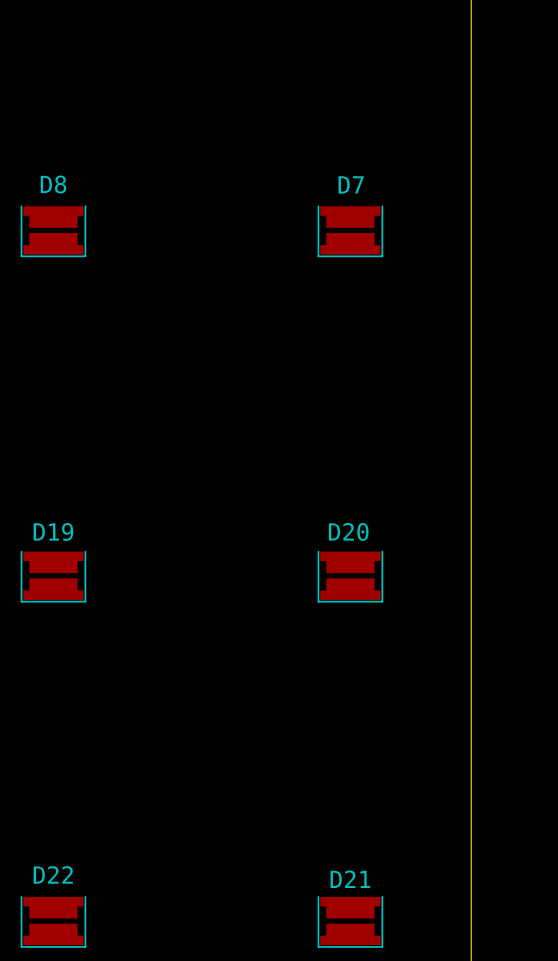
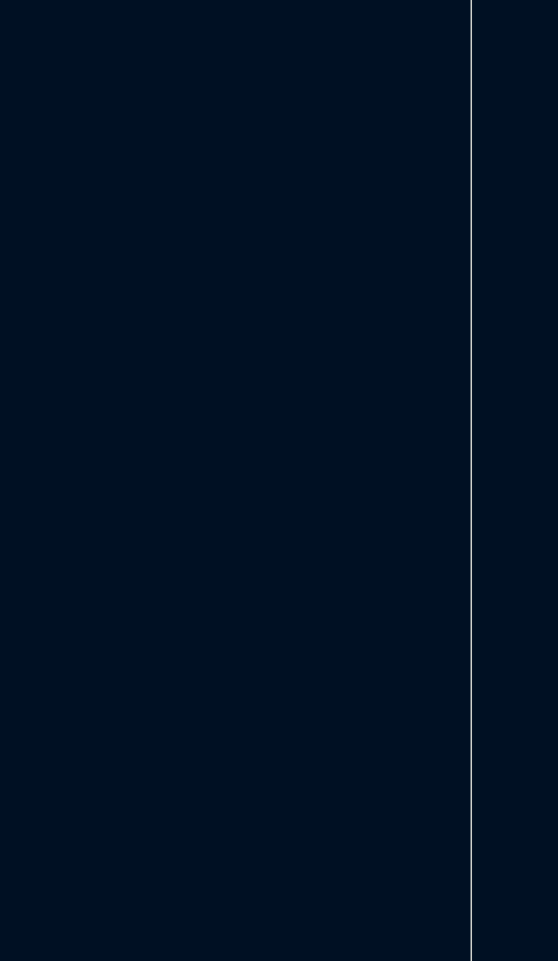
D8: (53, 231) -> none
D7: (350, 231) -> none
D19: (53, 576) -> none
D20: (350, 576) -> none
D22: (53, 921) -> none
D21: (350, 921) -> none

